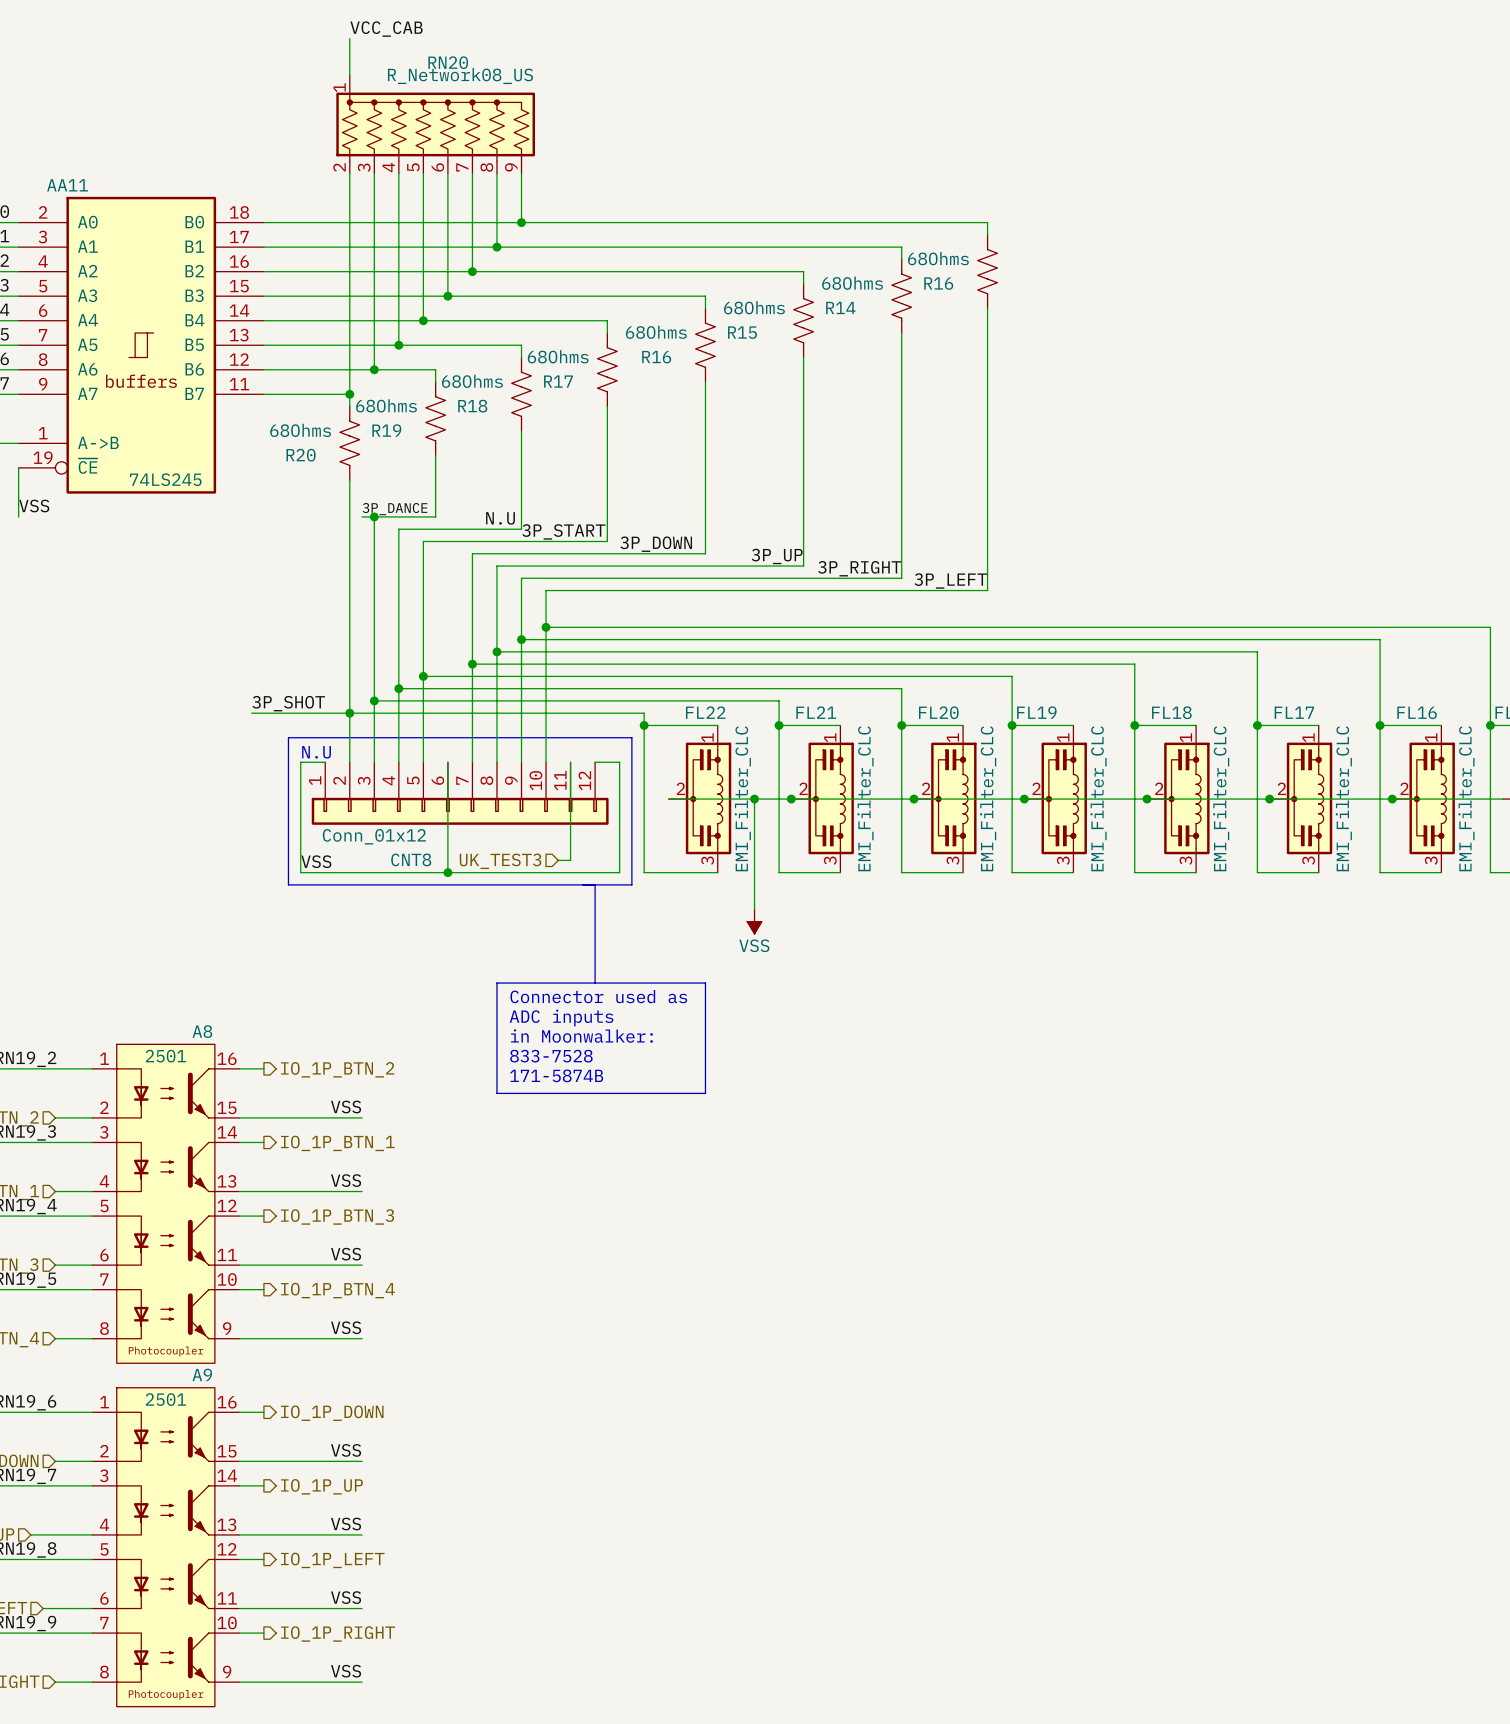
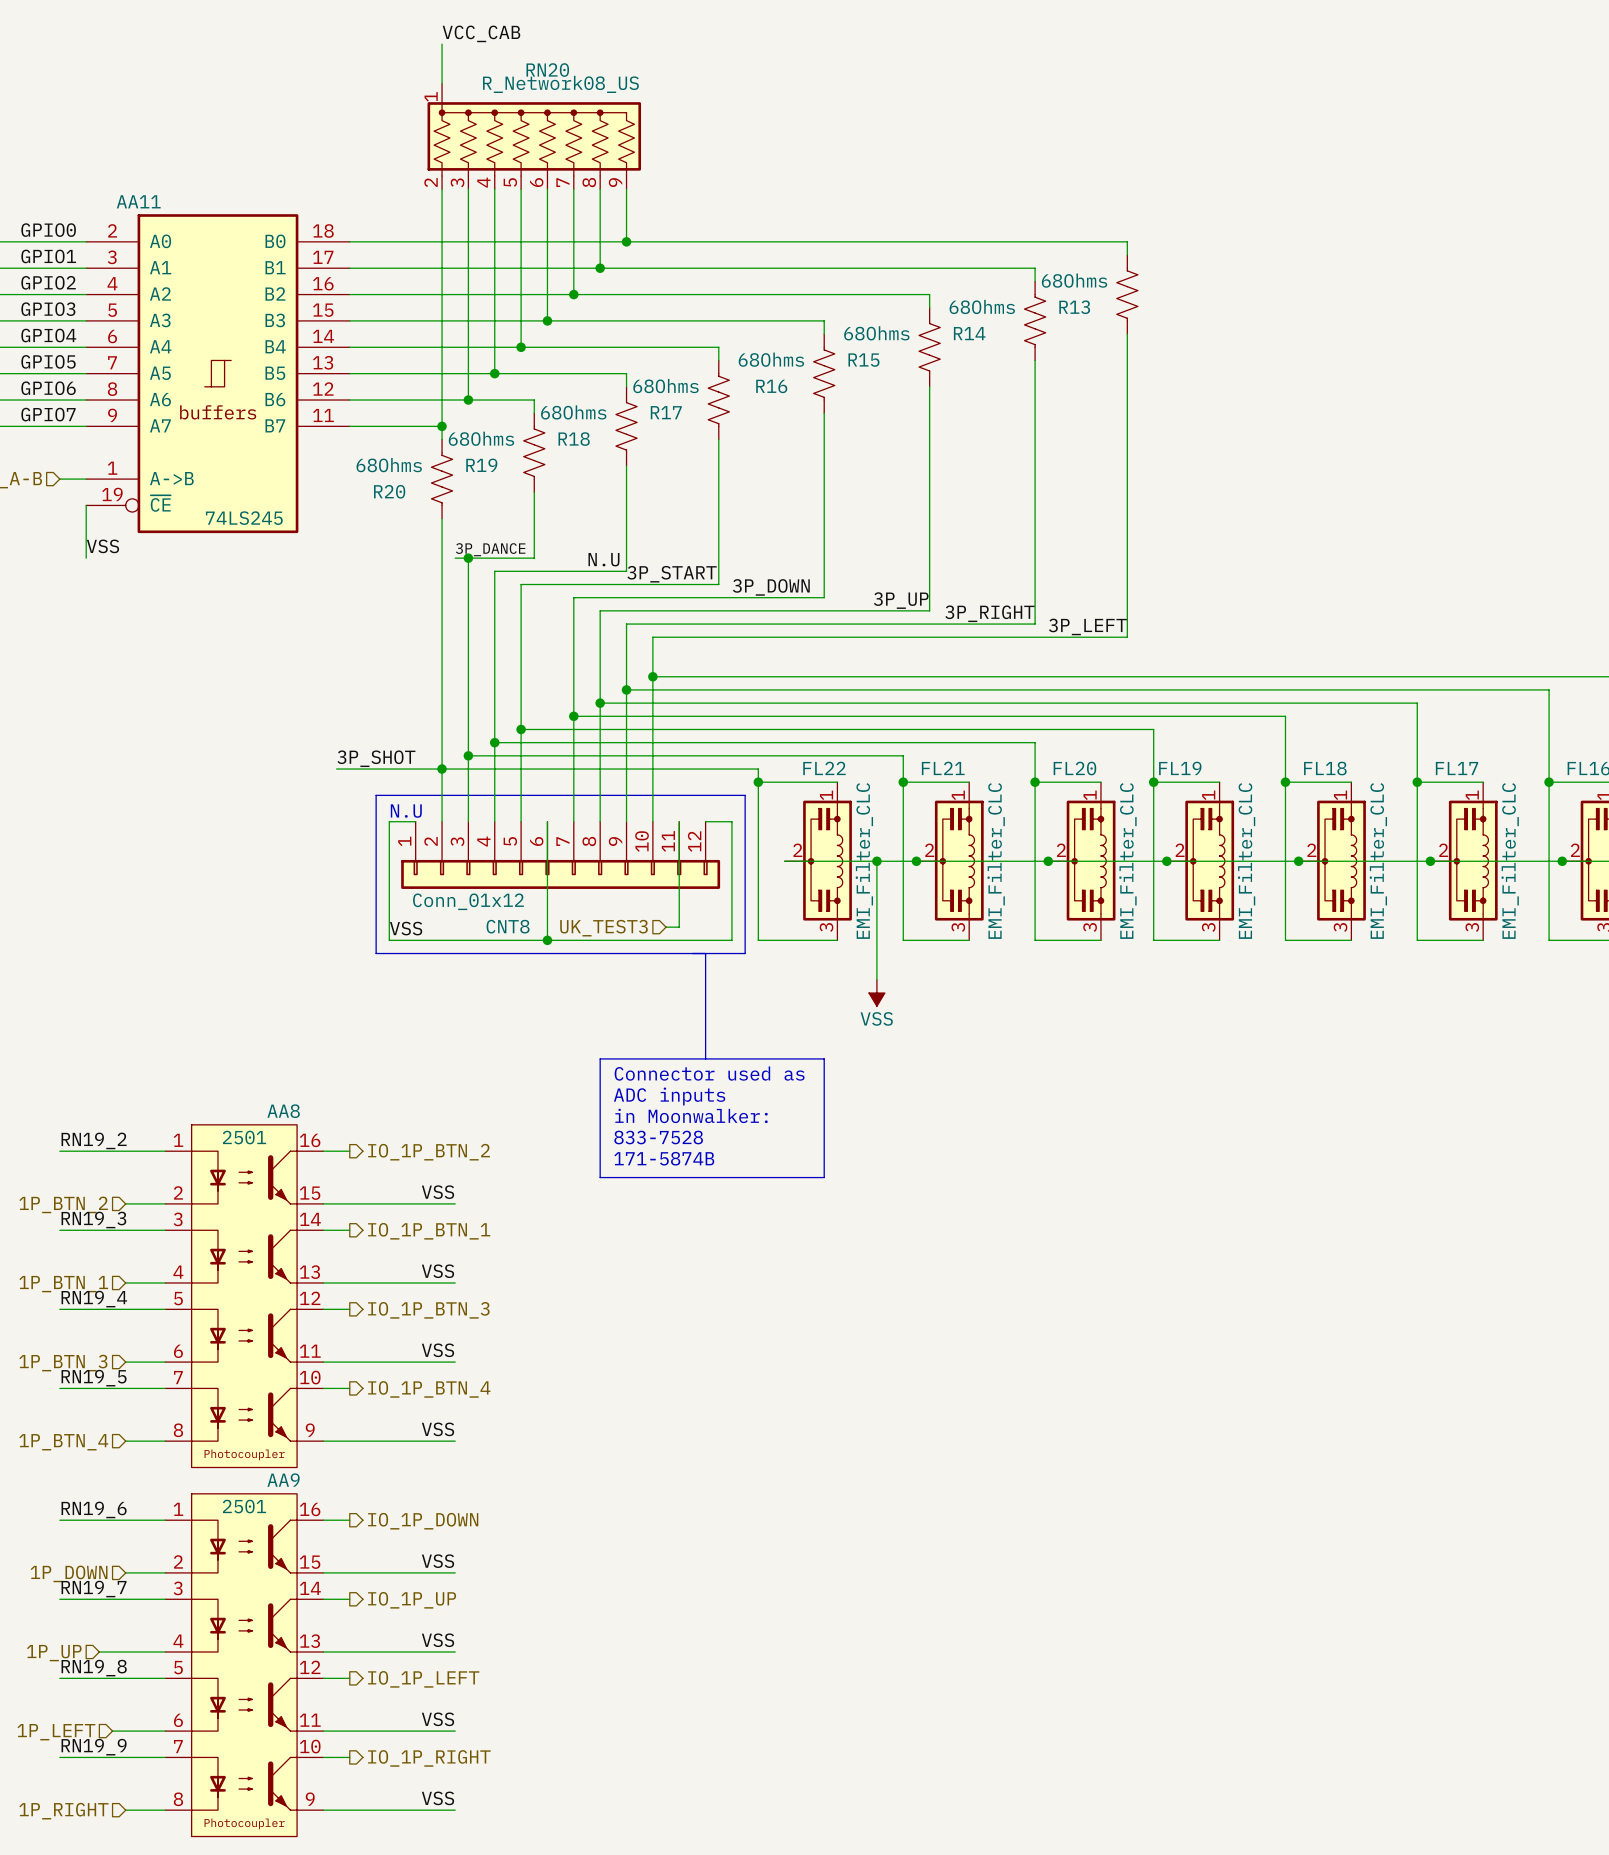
R16 name: R16 (938, 283) -> R13 (1074, 307)
A8 name: A8 (202, 1031) -> AA8 (283, 1111)
A9 name: A9 (202, 1374) -> AA9 (283, 1480)

